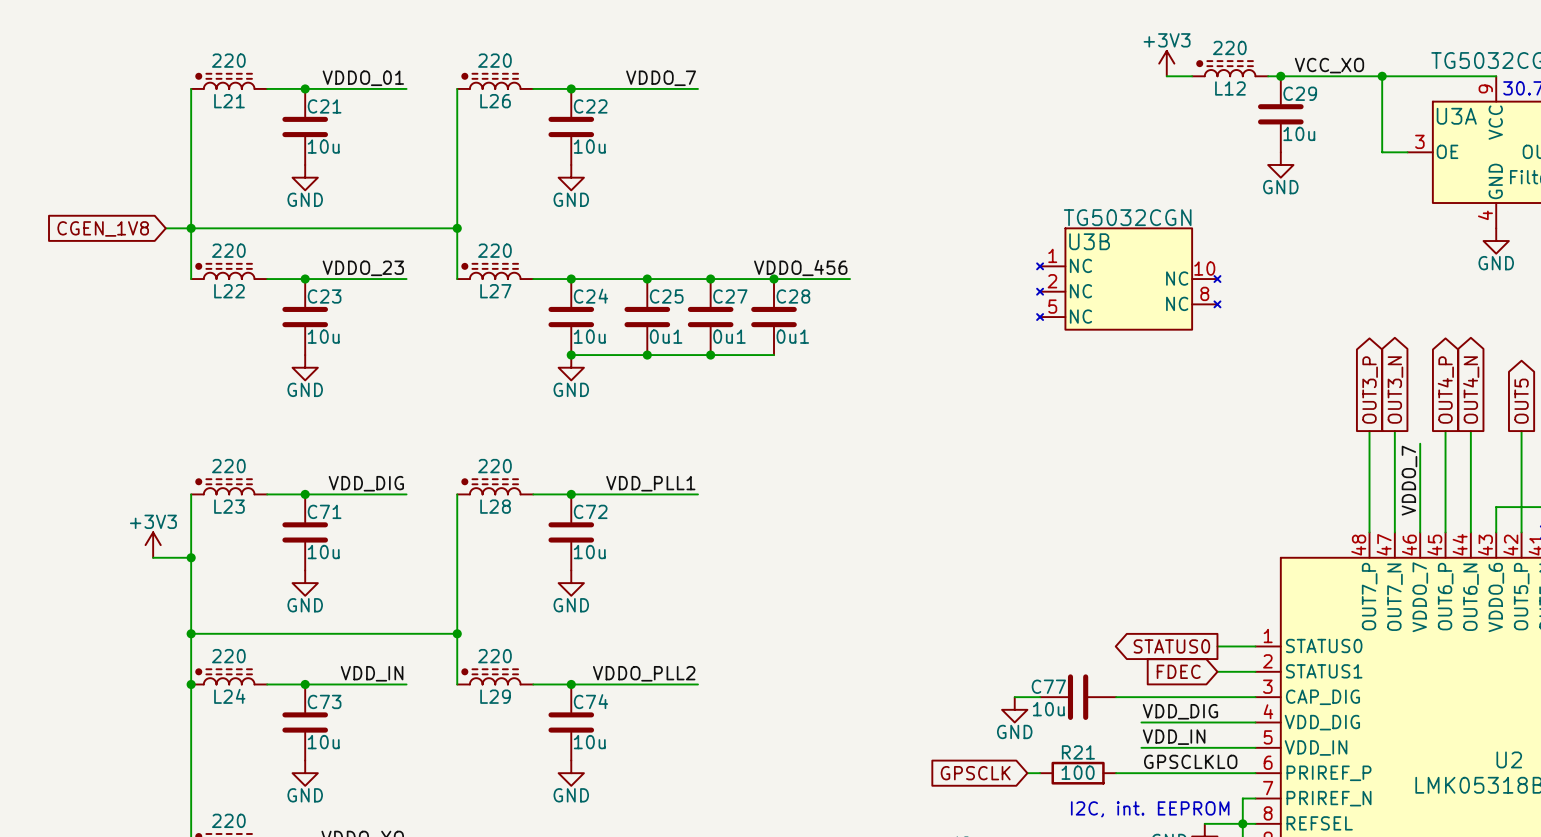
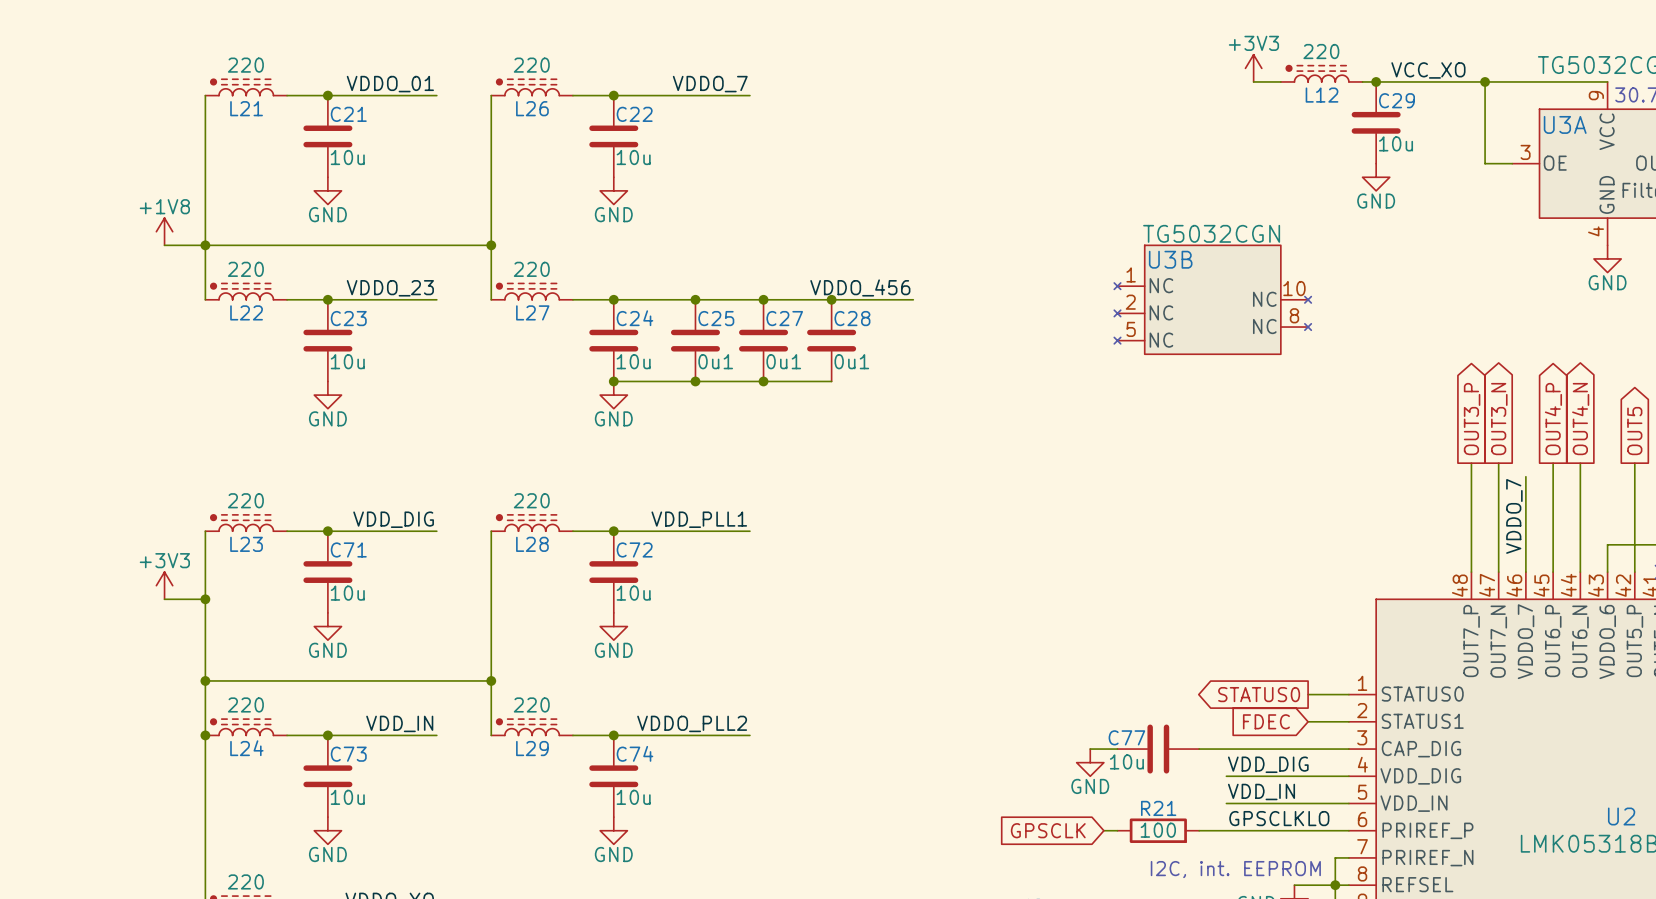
power symbol: none -> +1V8 (164, 231)
global label: CGEN_1V8 (103, 228) -> none
wire: none -> (164, 245) (178, 245)

